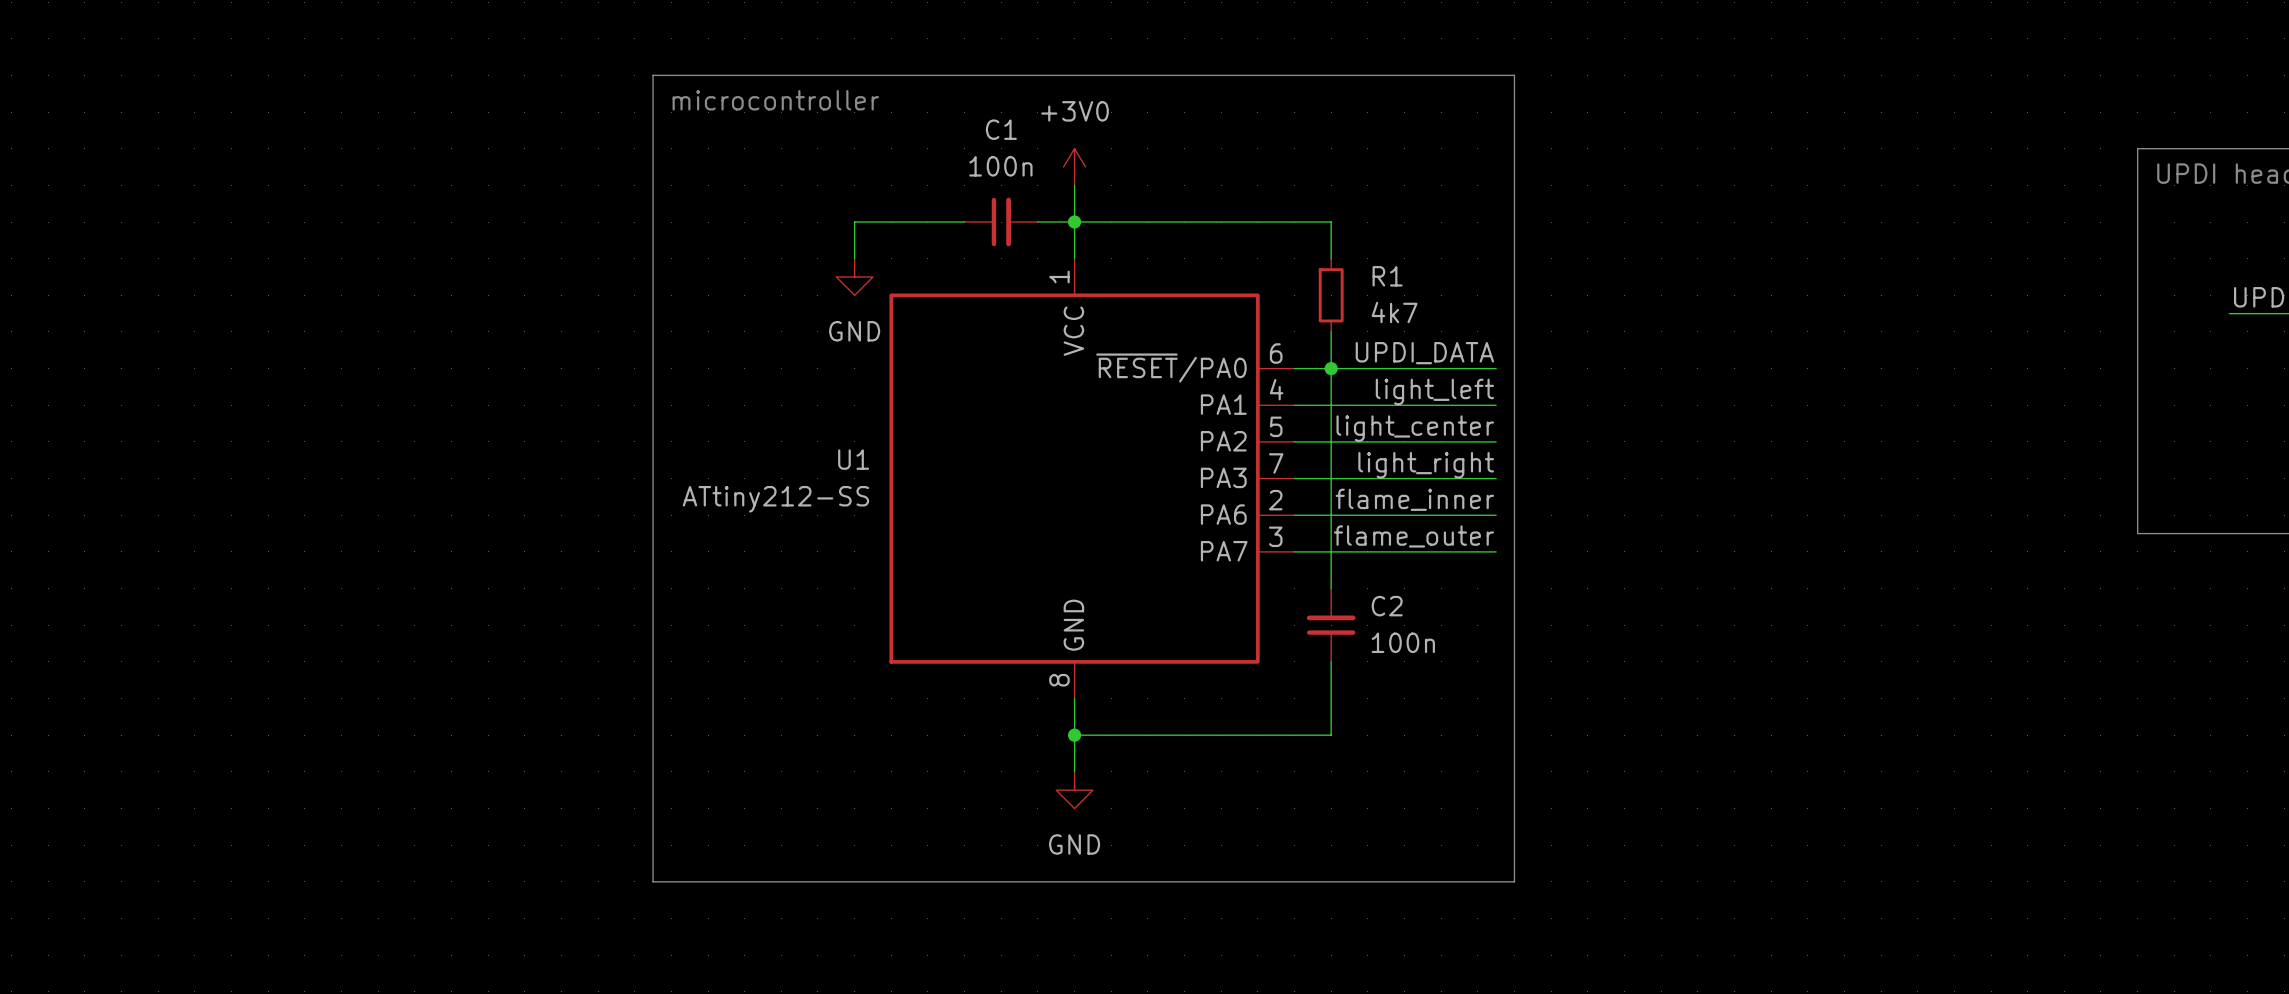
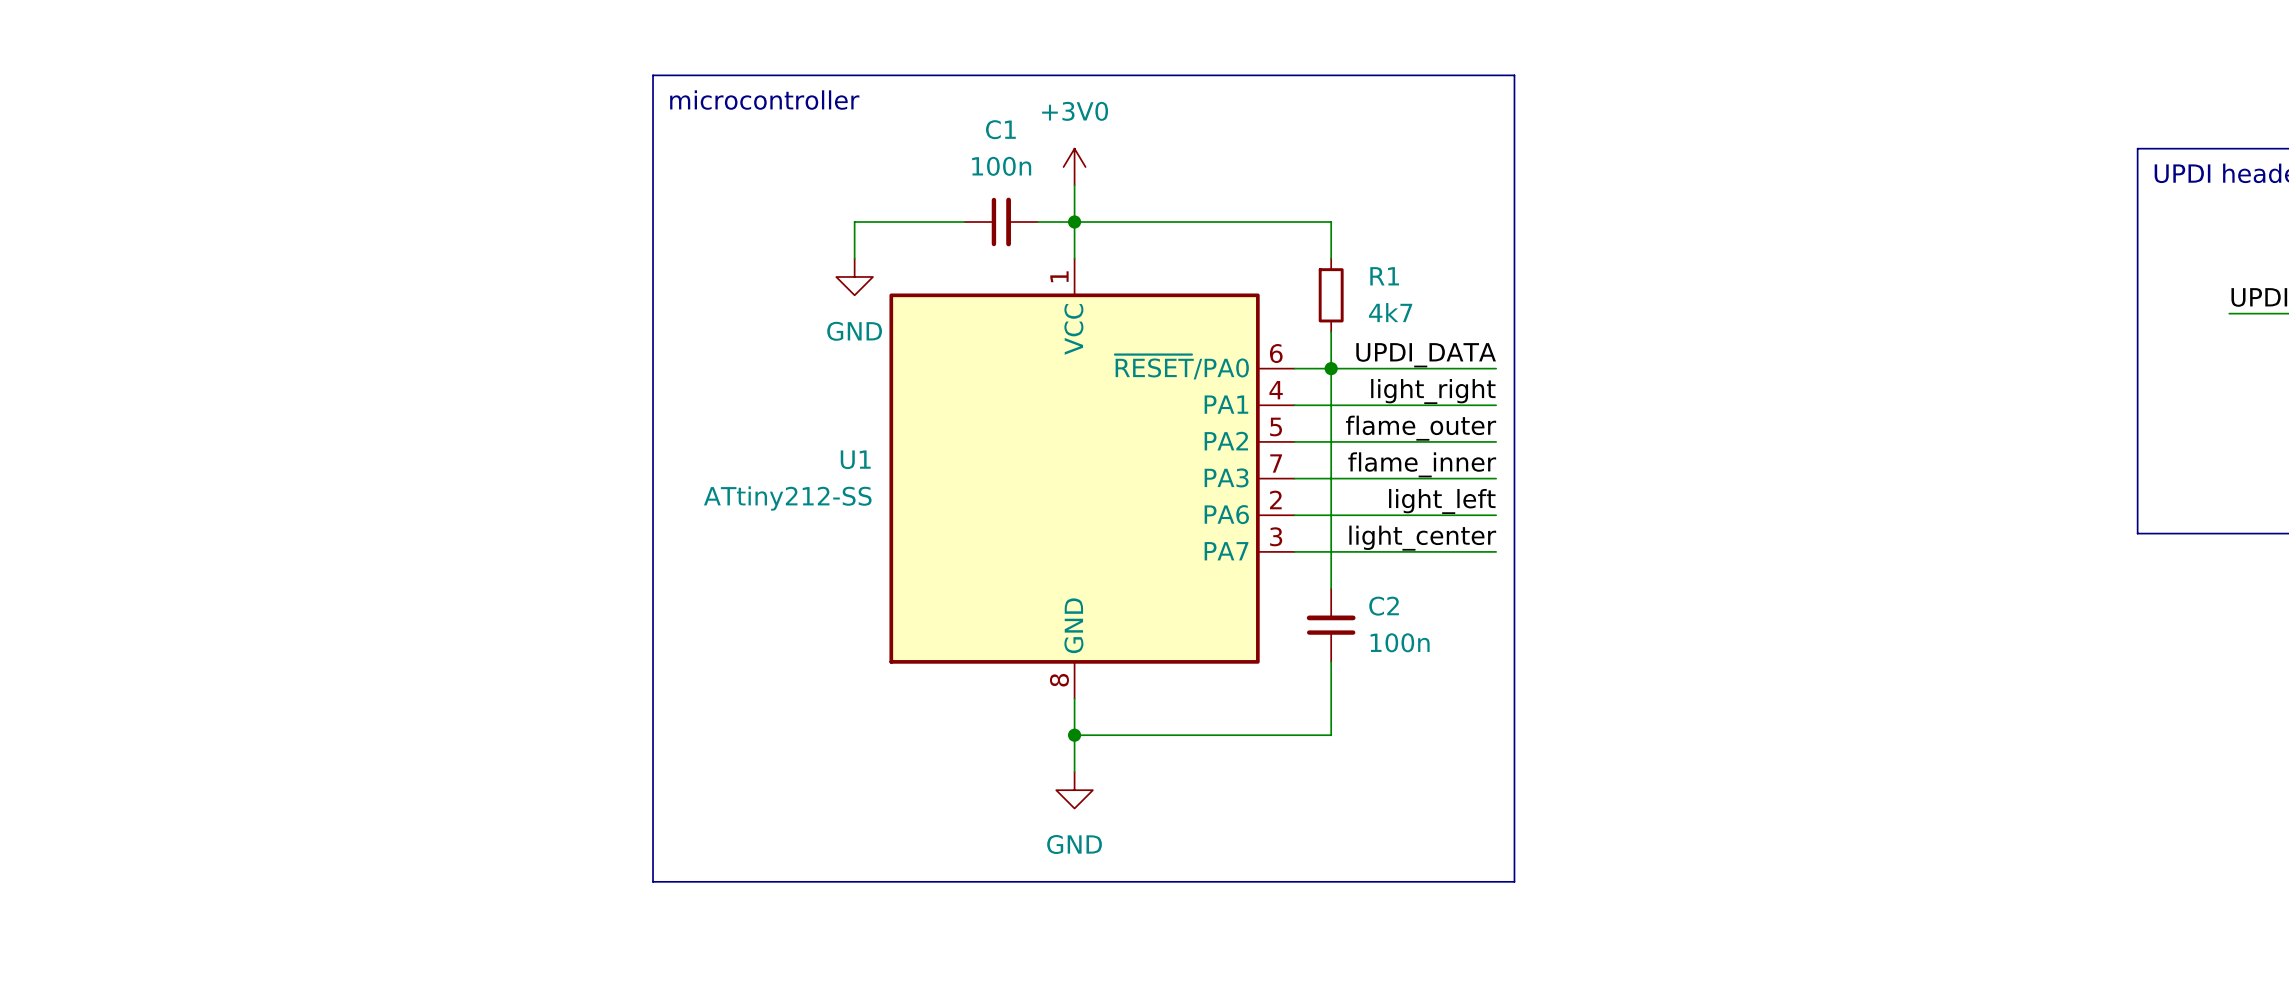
label: light_left (1434, 391) -> light_right (1433, 391)
label: light_center (1415, 428) -> flame_outer (1421, 428)
label: light_right (1426, 465) -> flame_inner (1422, 464)
label: flame_inner (1414, 499) -> light_left (1442, 501)
label: flame_outer (1413, 536) -> light_center (1422, 538)

